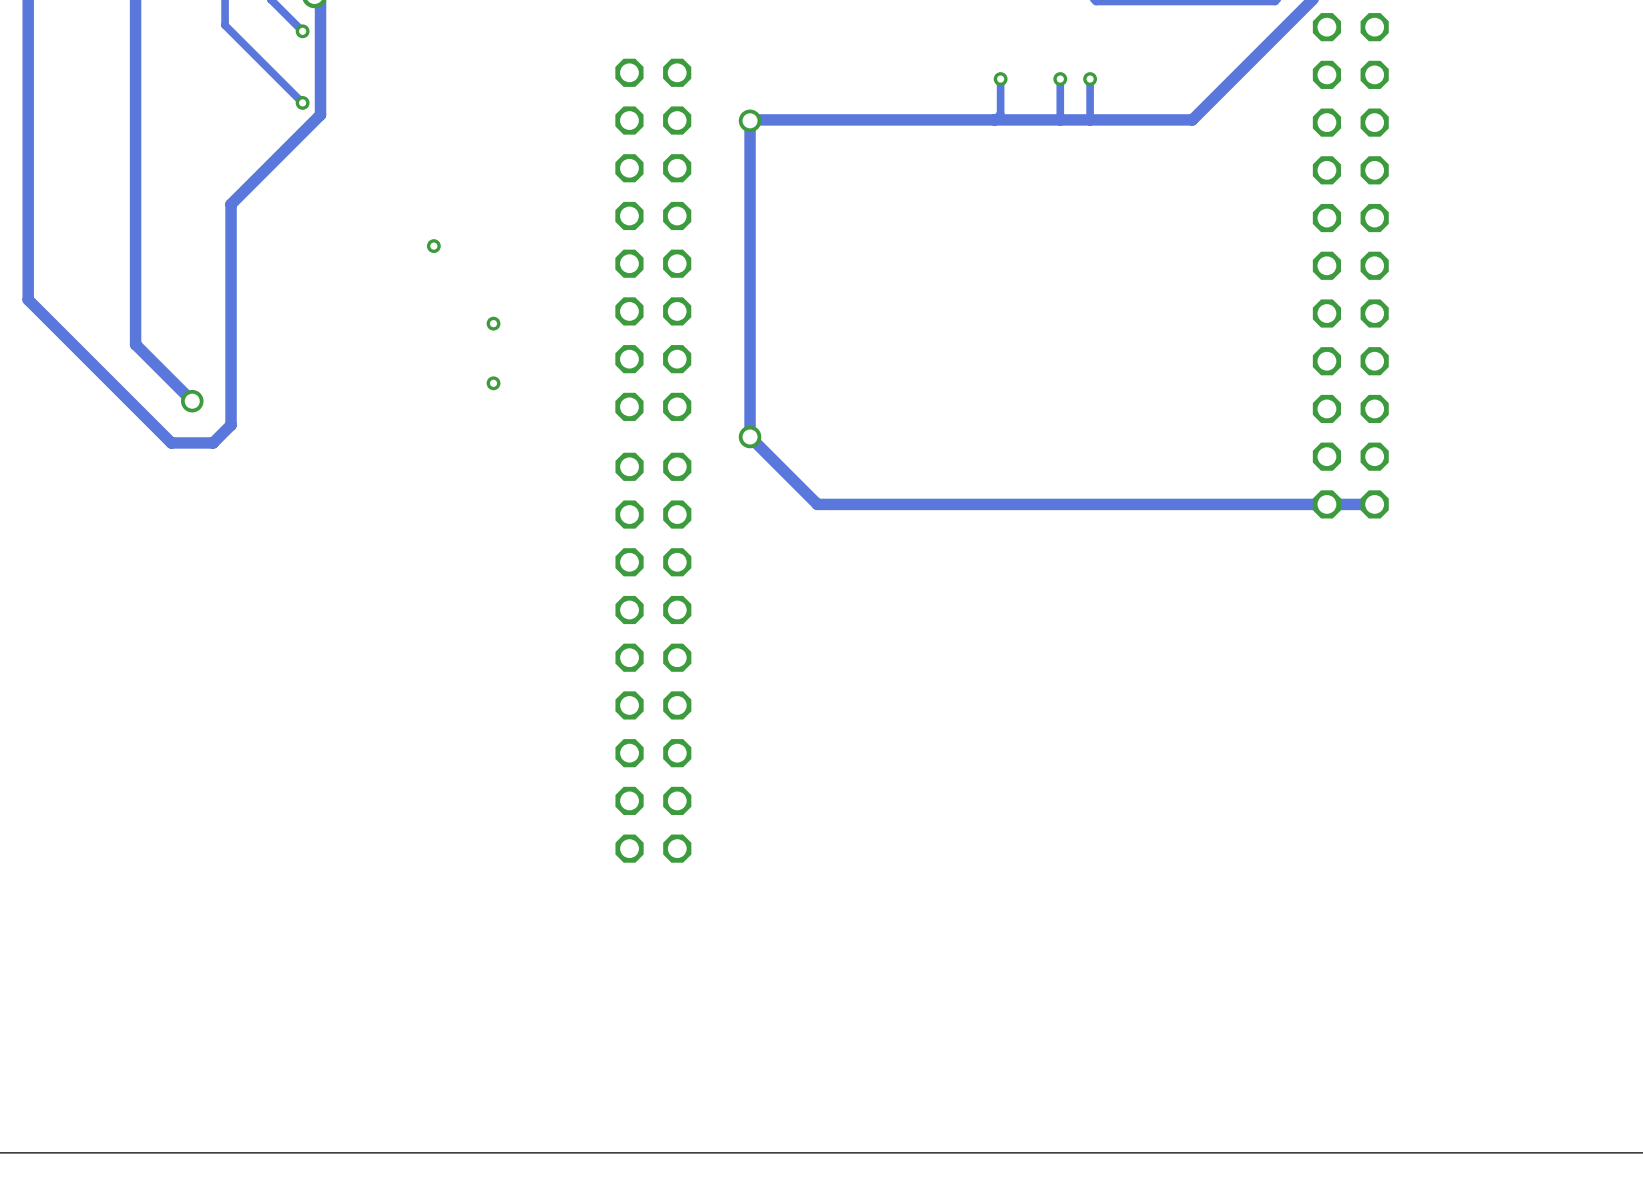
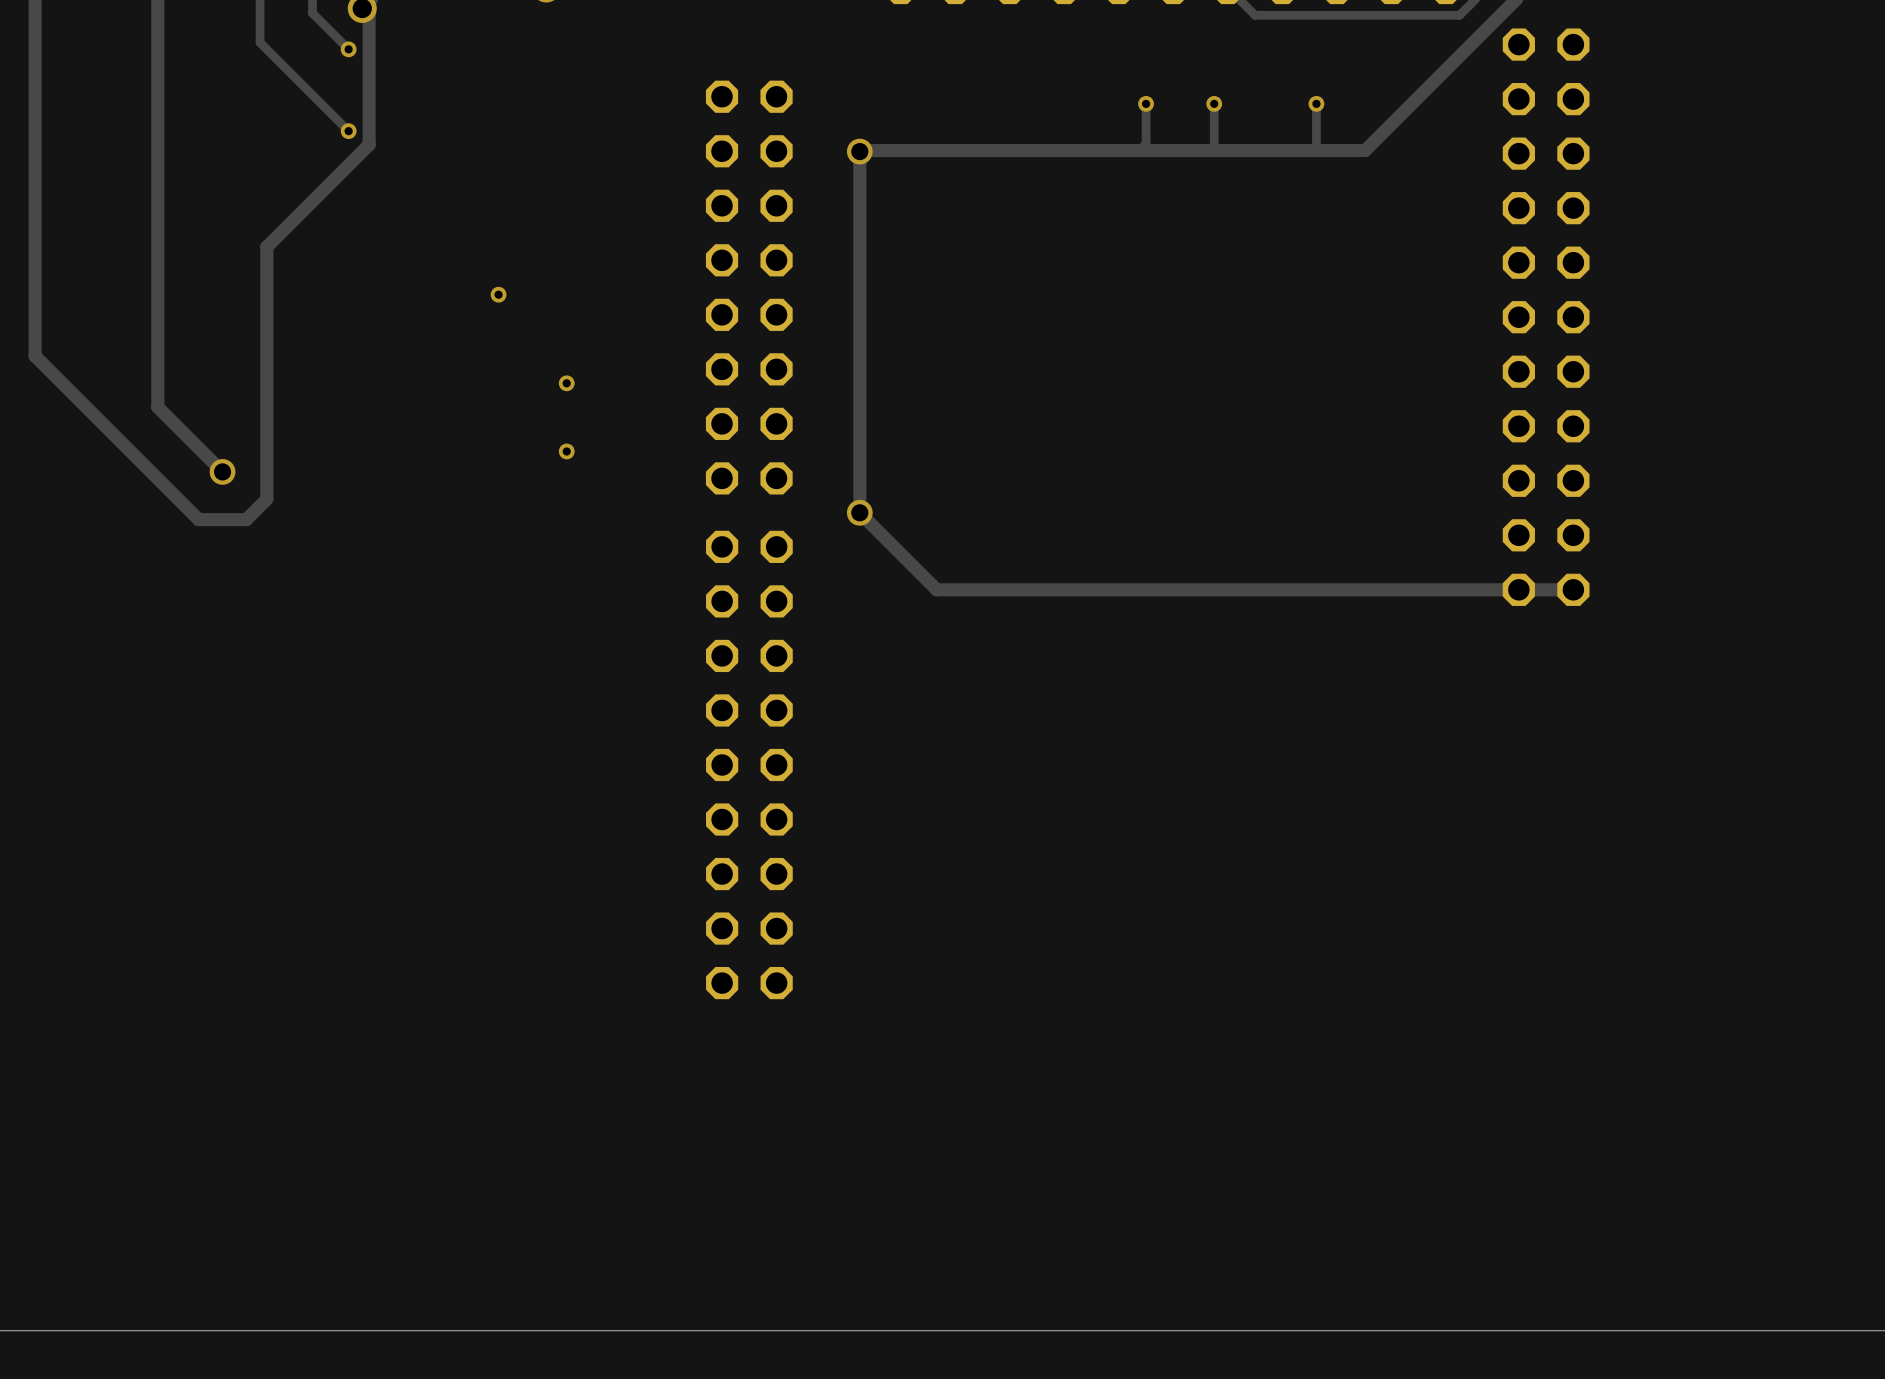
track: (1090, 79) (1090, 119) -> (1316, 103) (1316, 150)
via position: (1090, 79) -> (1316, 103)

